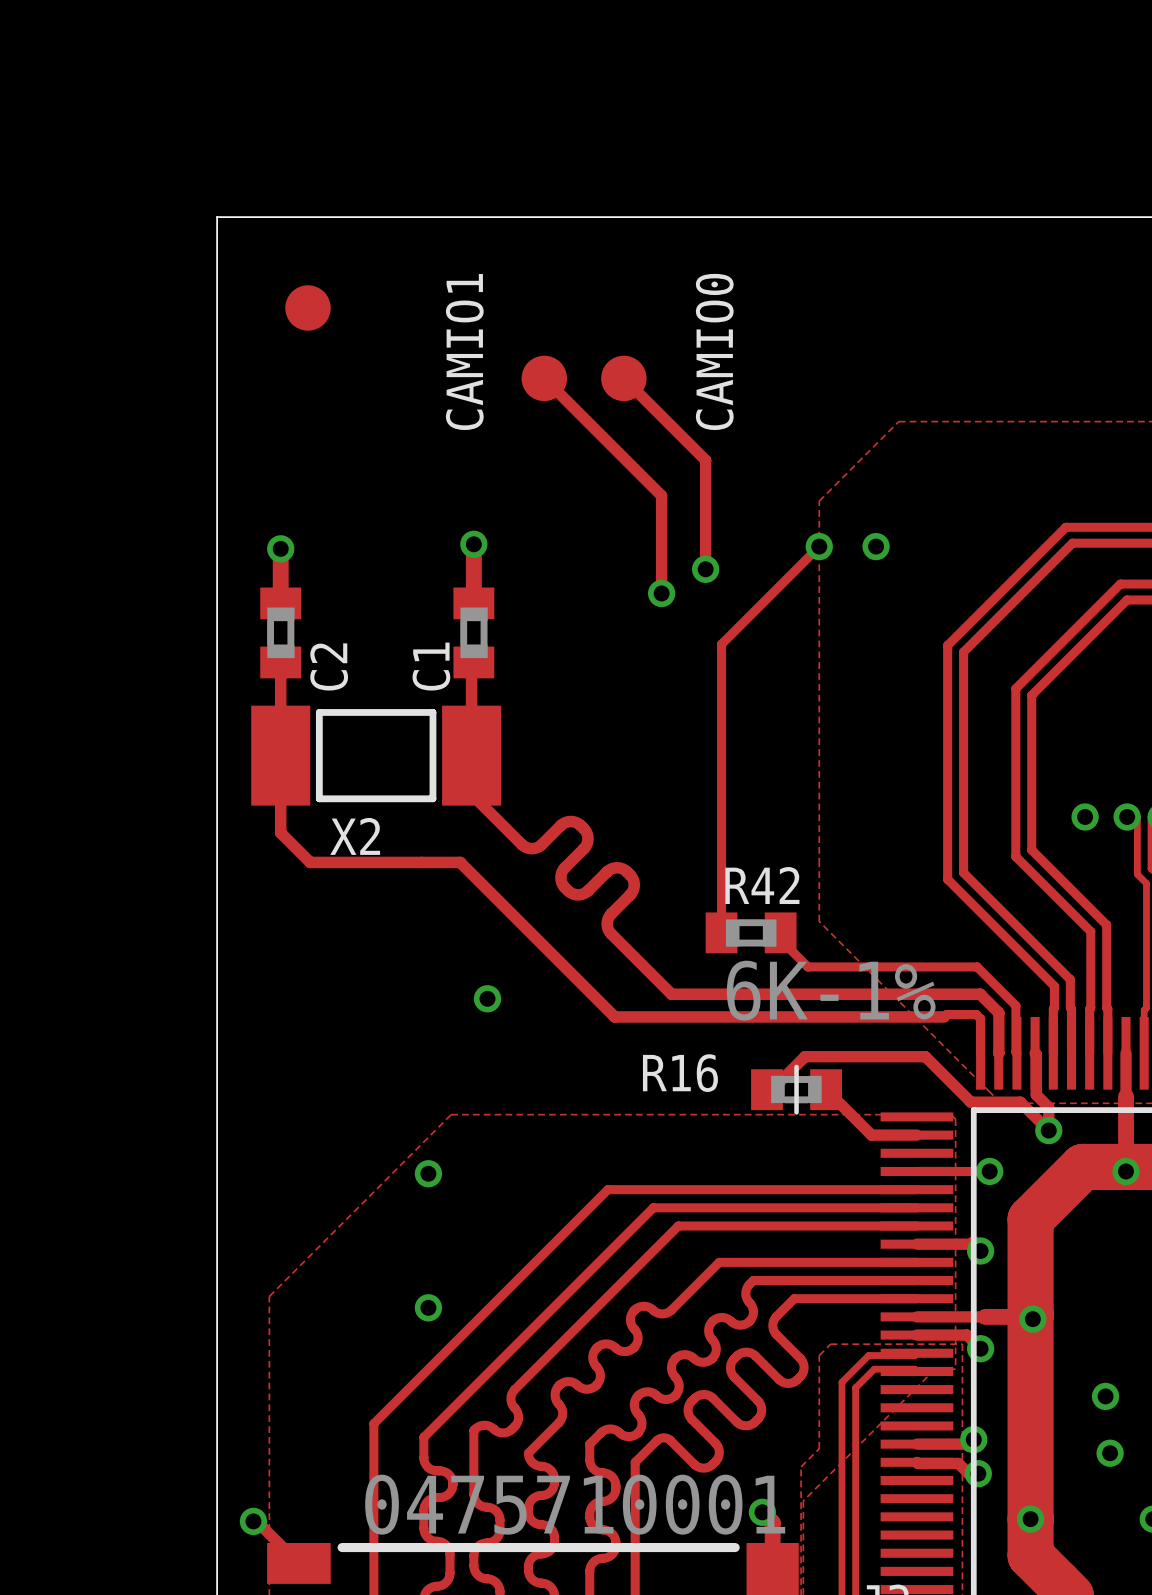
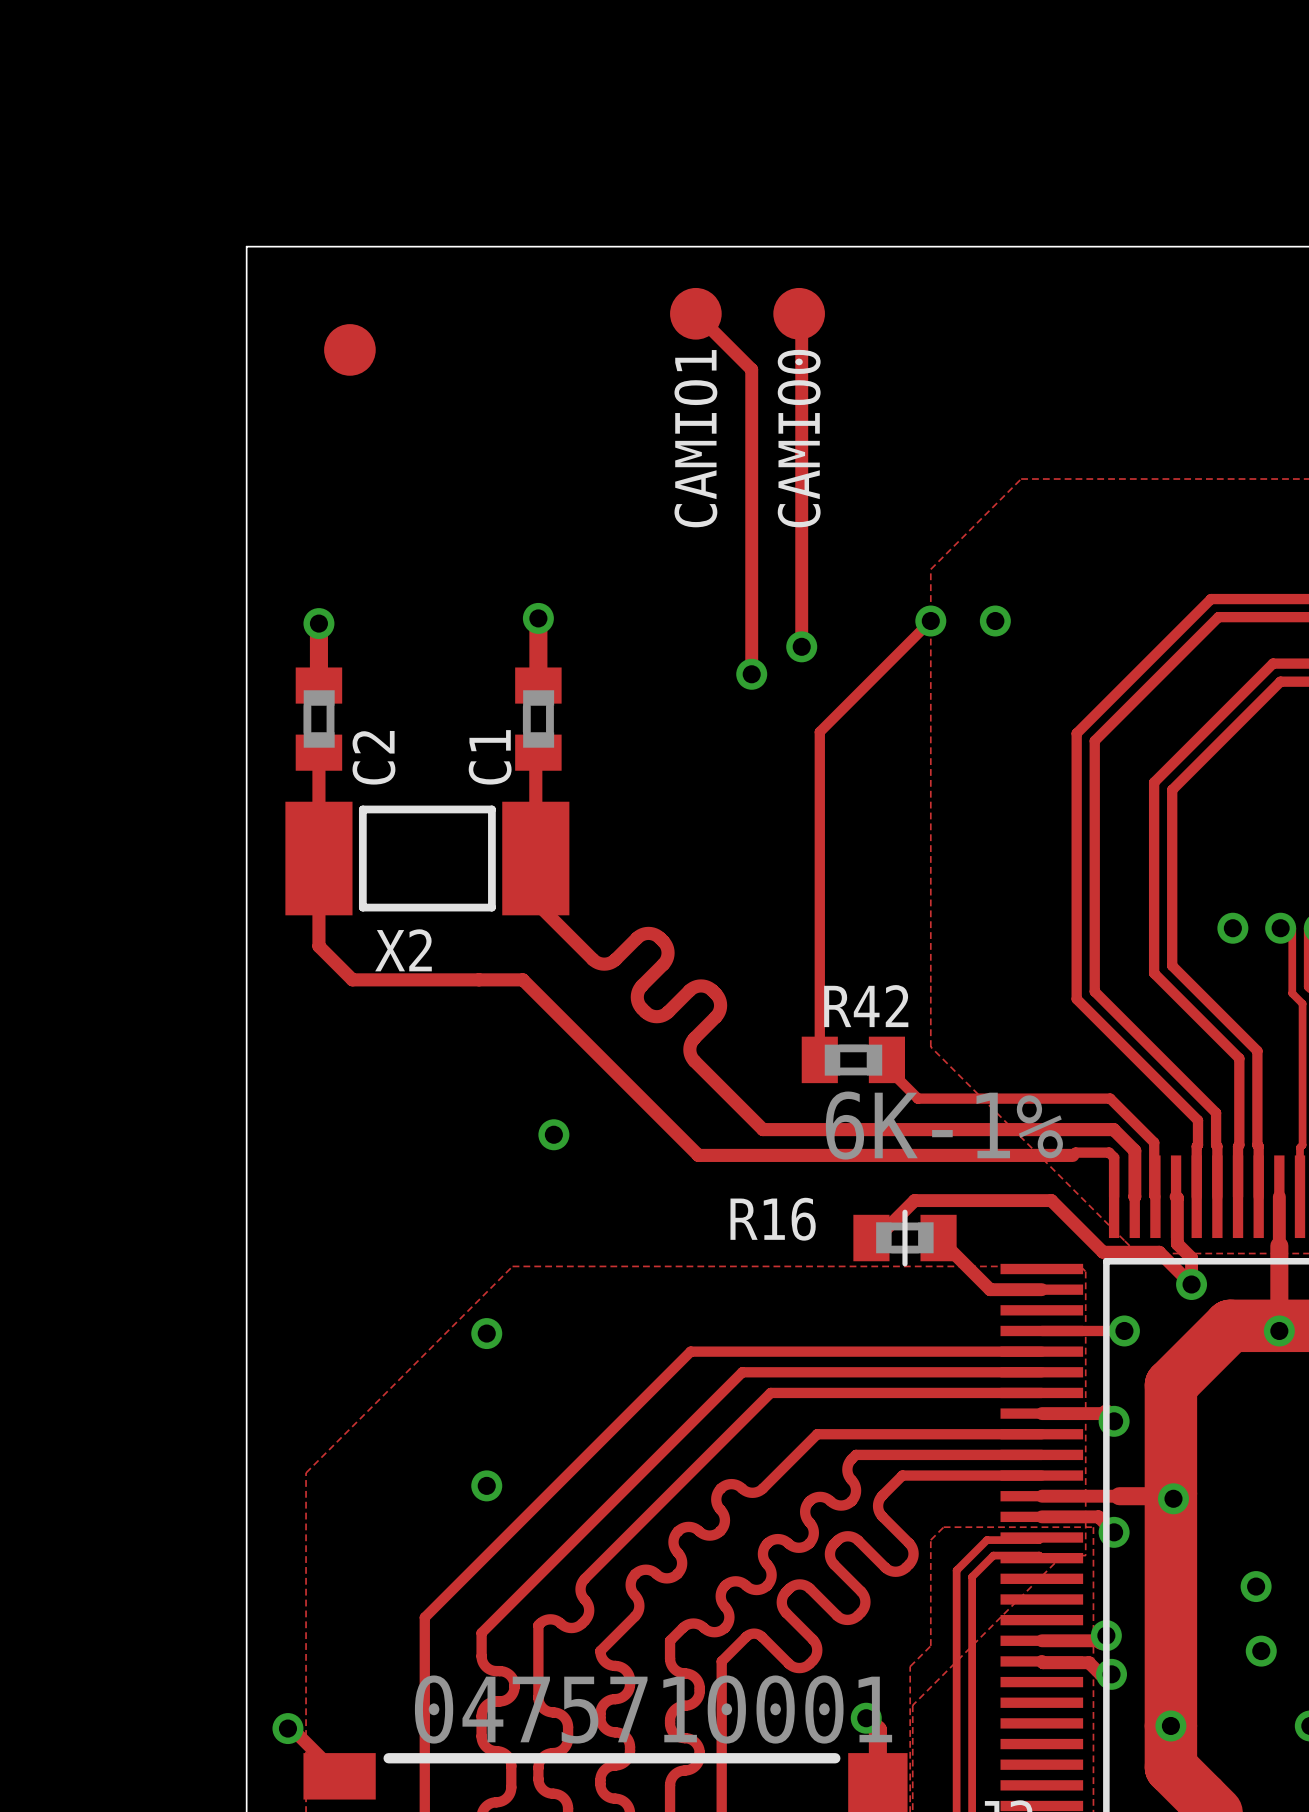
CAMIO0 name position: CAMIO0 (714, 351) -> CAMIO0 (799, 438)
CAMIO1 name position: CAMIO1 (464, 352) -> CAMIO1 (695, 438)
track: (544, 378) (661, 495) -> (695, 313) (751, 369) (751, 563)
CAMIO1 position: (544, 378) -> (695, 313)
track: (623, 378) (705, 460) -> (799, 313) (801, 316) (801, 522)
CAMIO0 position: (623, 378) -> (799, 313)

